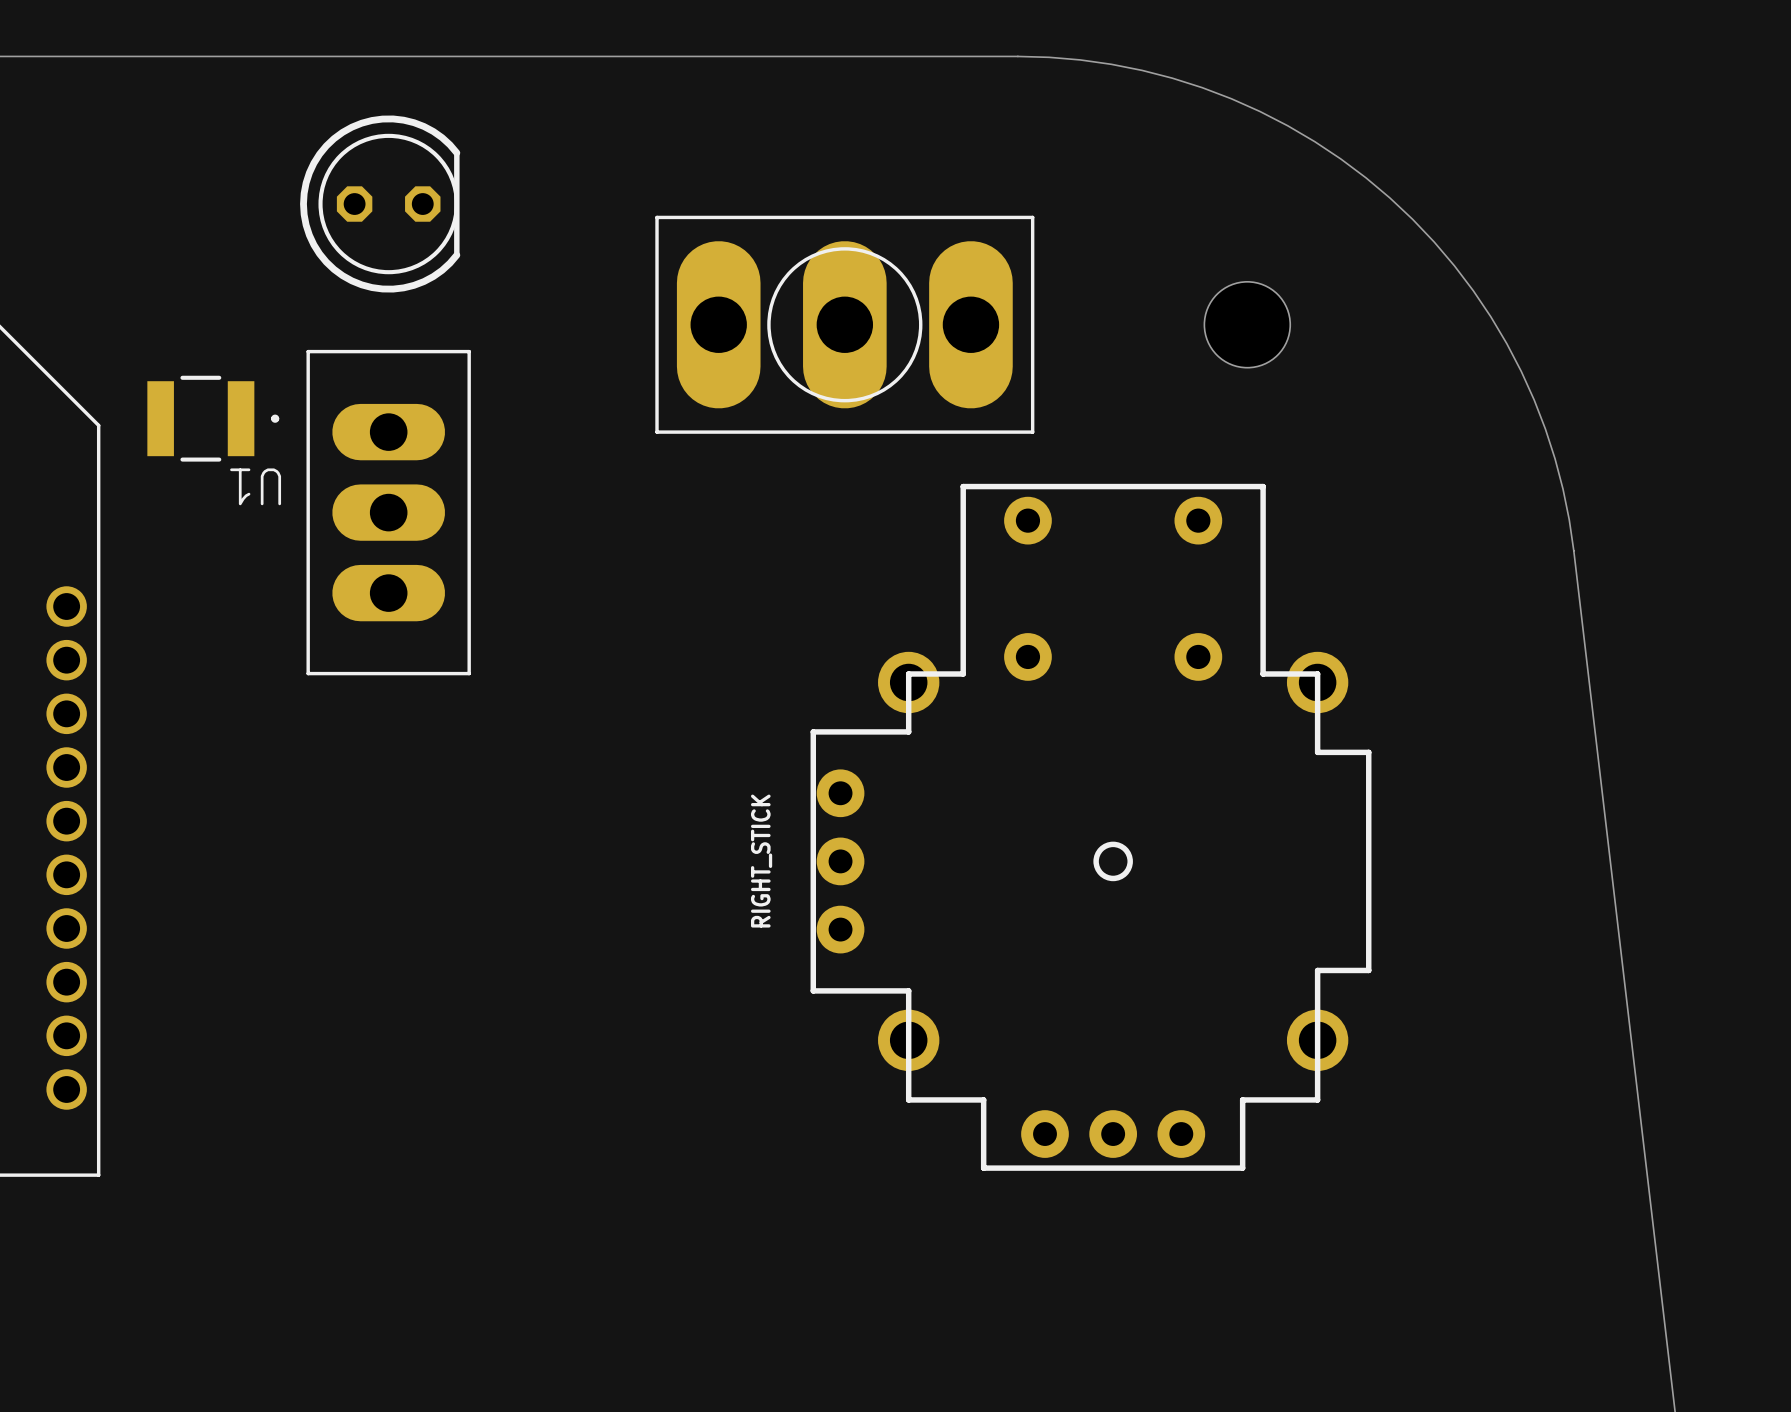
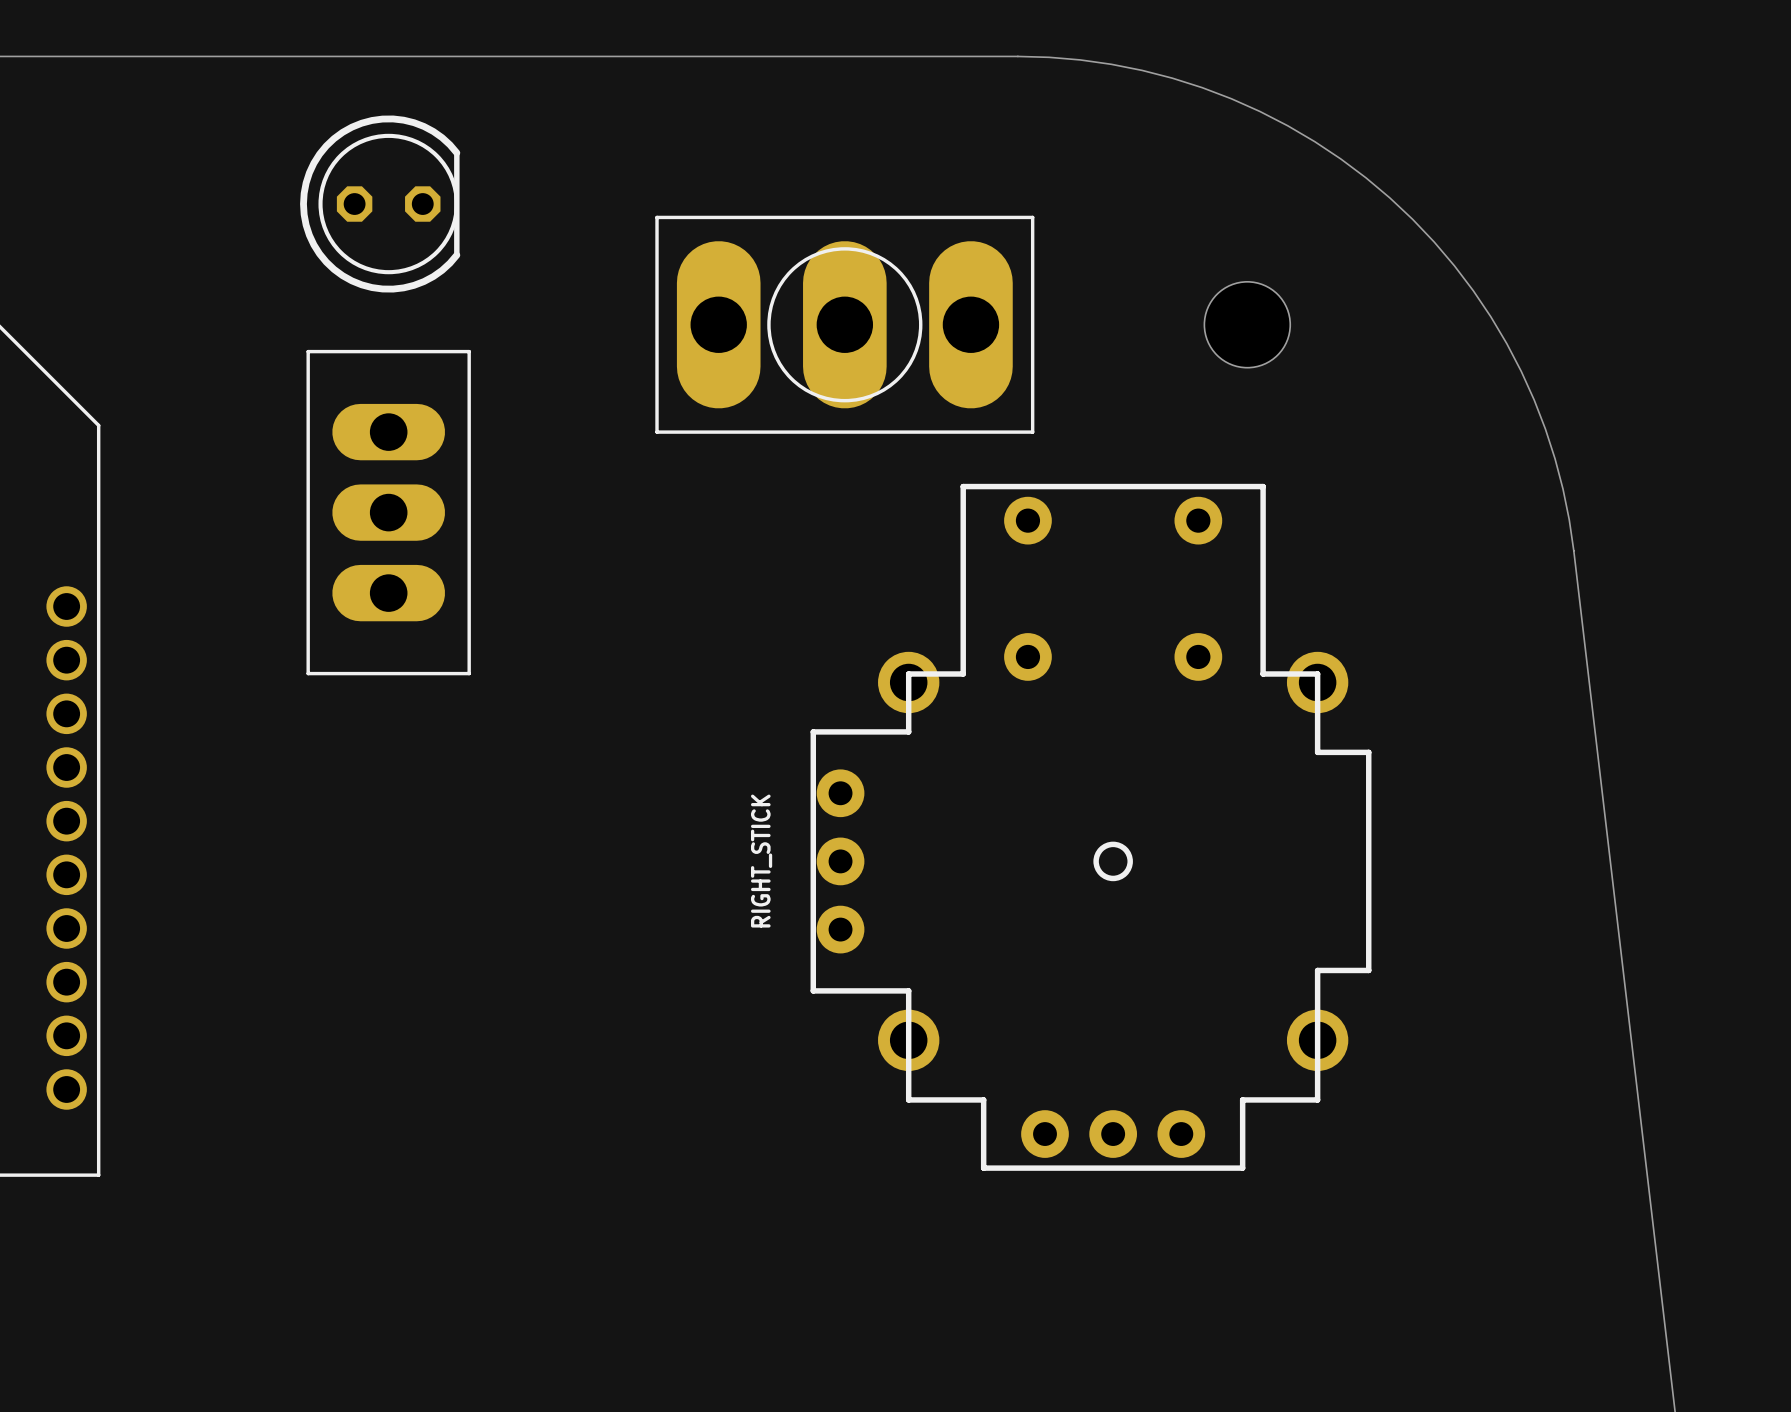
U1: (213, 418) -> none

